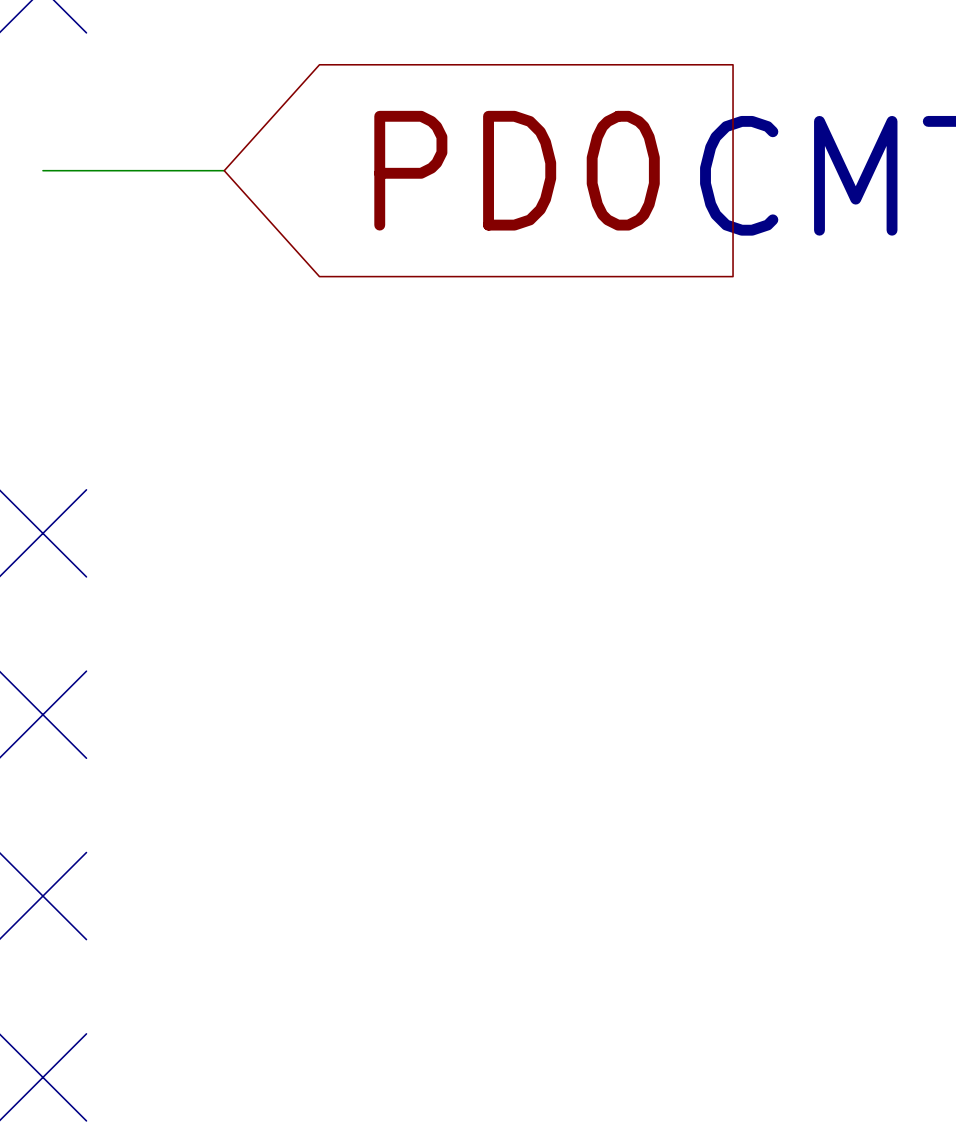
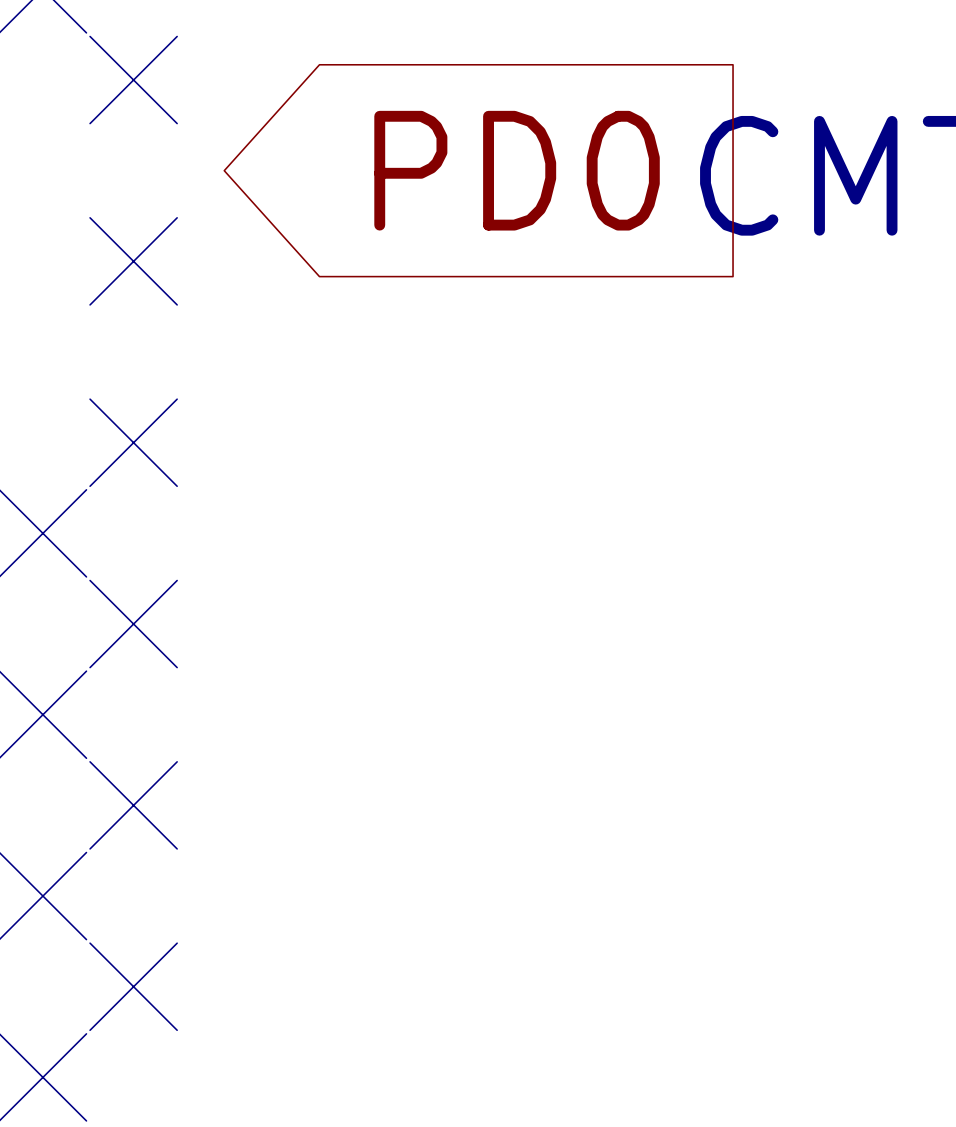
no-connect mark: none -> (133, 80)
wire: (42, 170) (224, 170) -> none
no-connect mark: none -> (133, 261)
no-connect mark: none -> (133, 442)
no-connect mark: none -> (133, 624)
no-connect mark: none -> (133, 805)
no-connect mark: none -> (133, 986)

